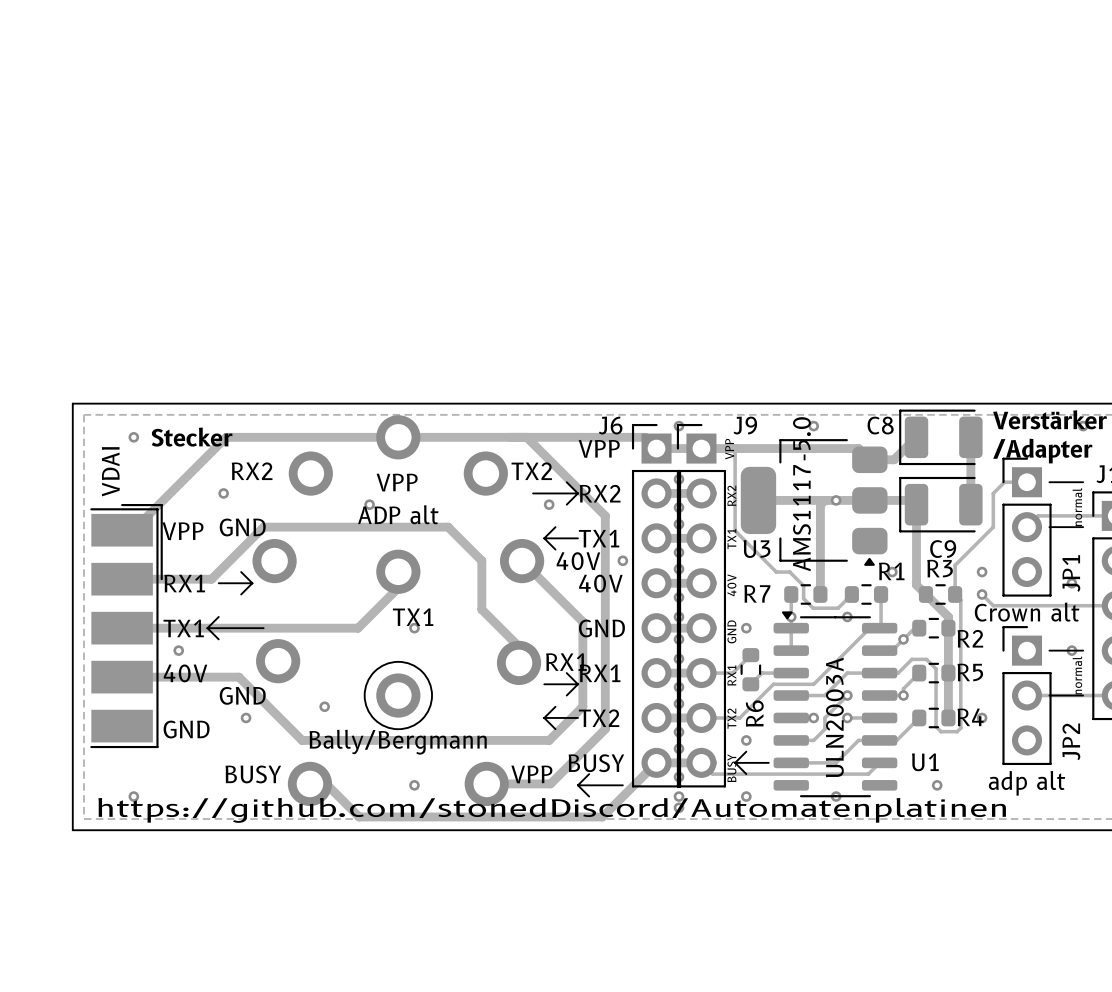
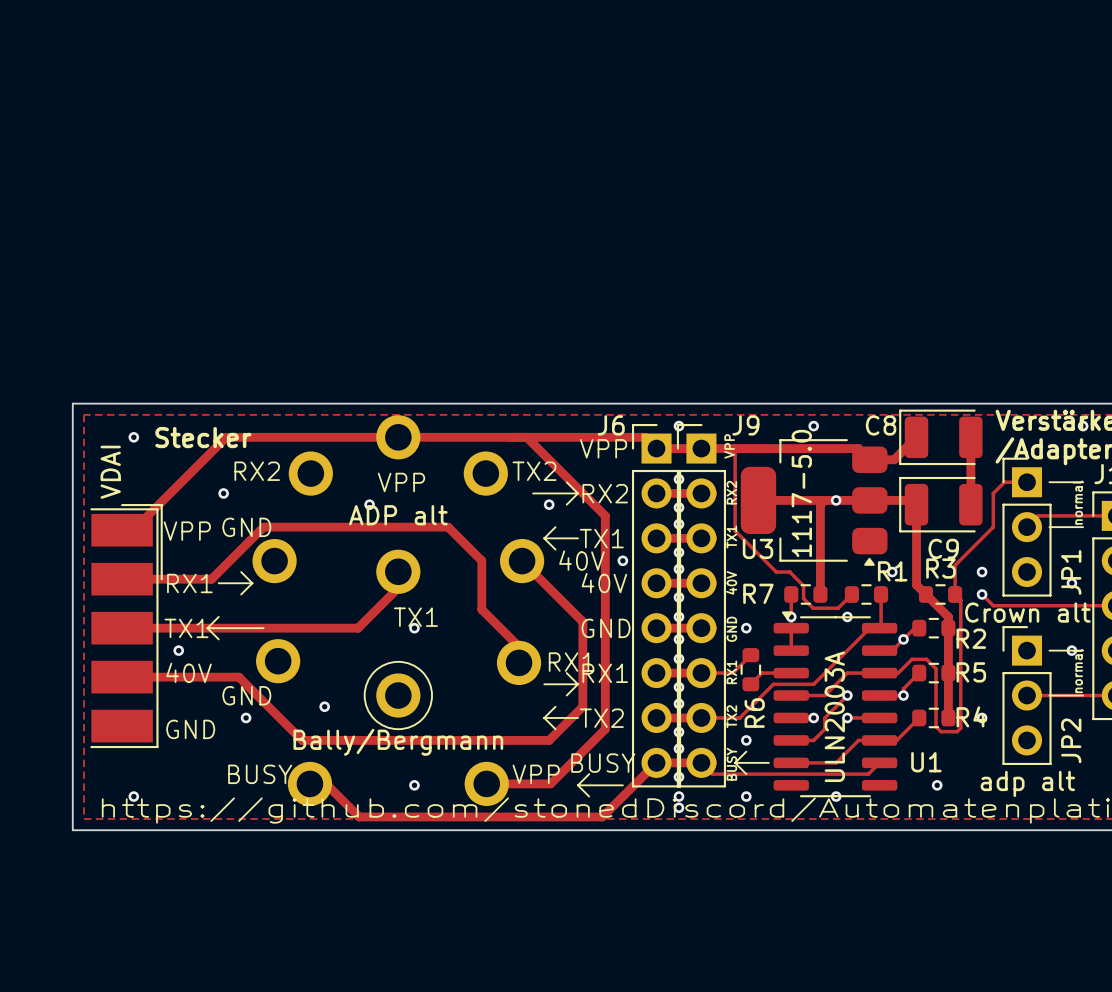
U3 value: AMS1117-5.0 (801, 494) -> 1117-5.0 (801, 493)

